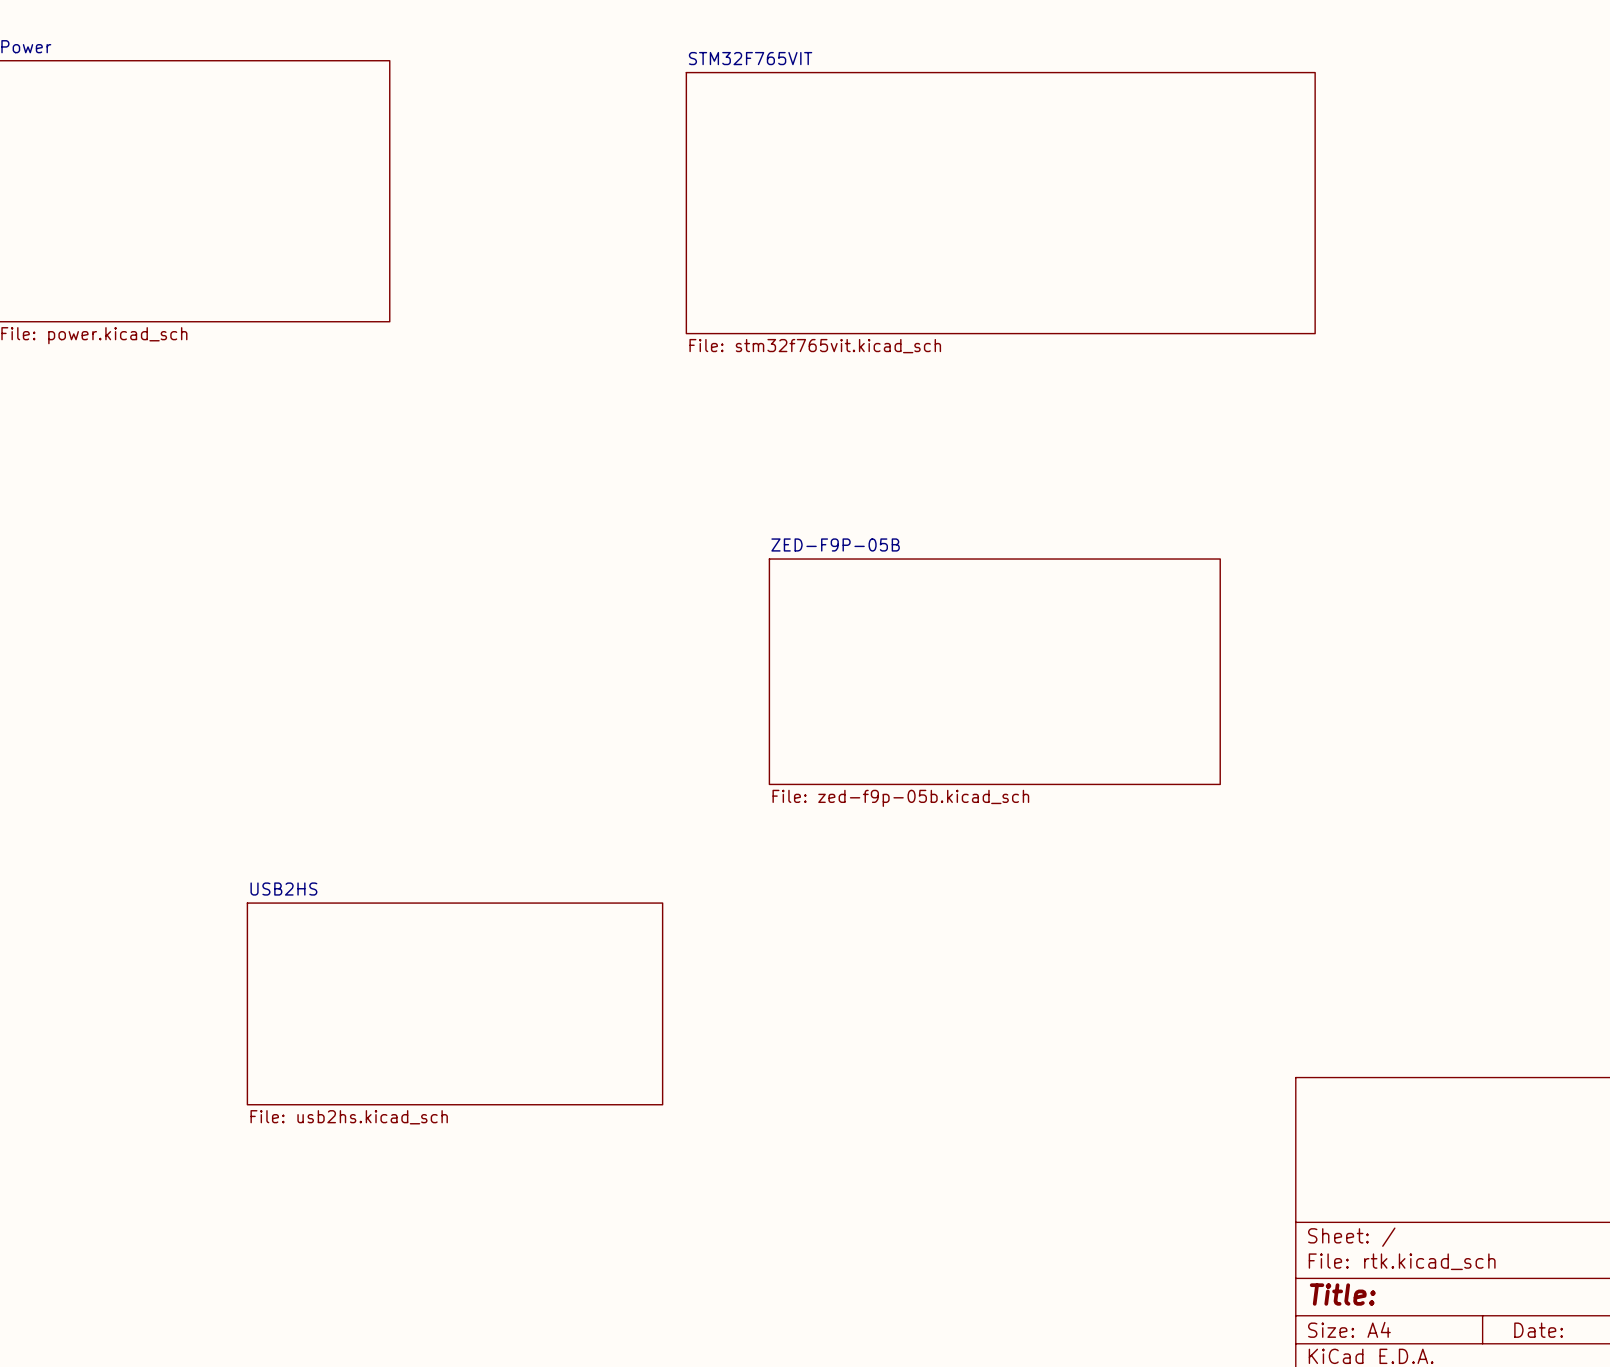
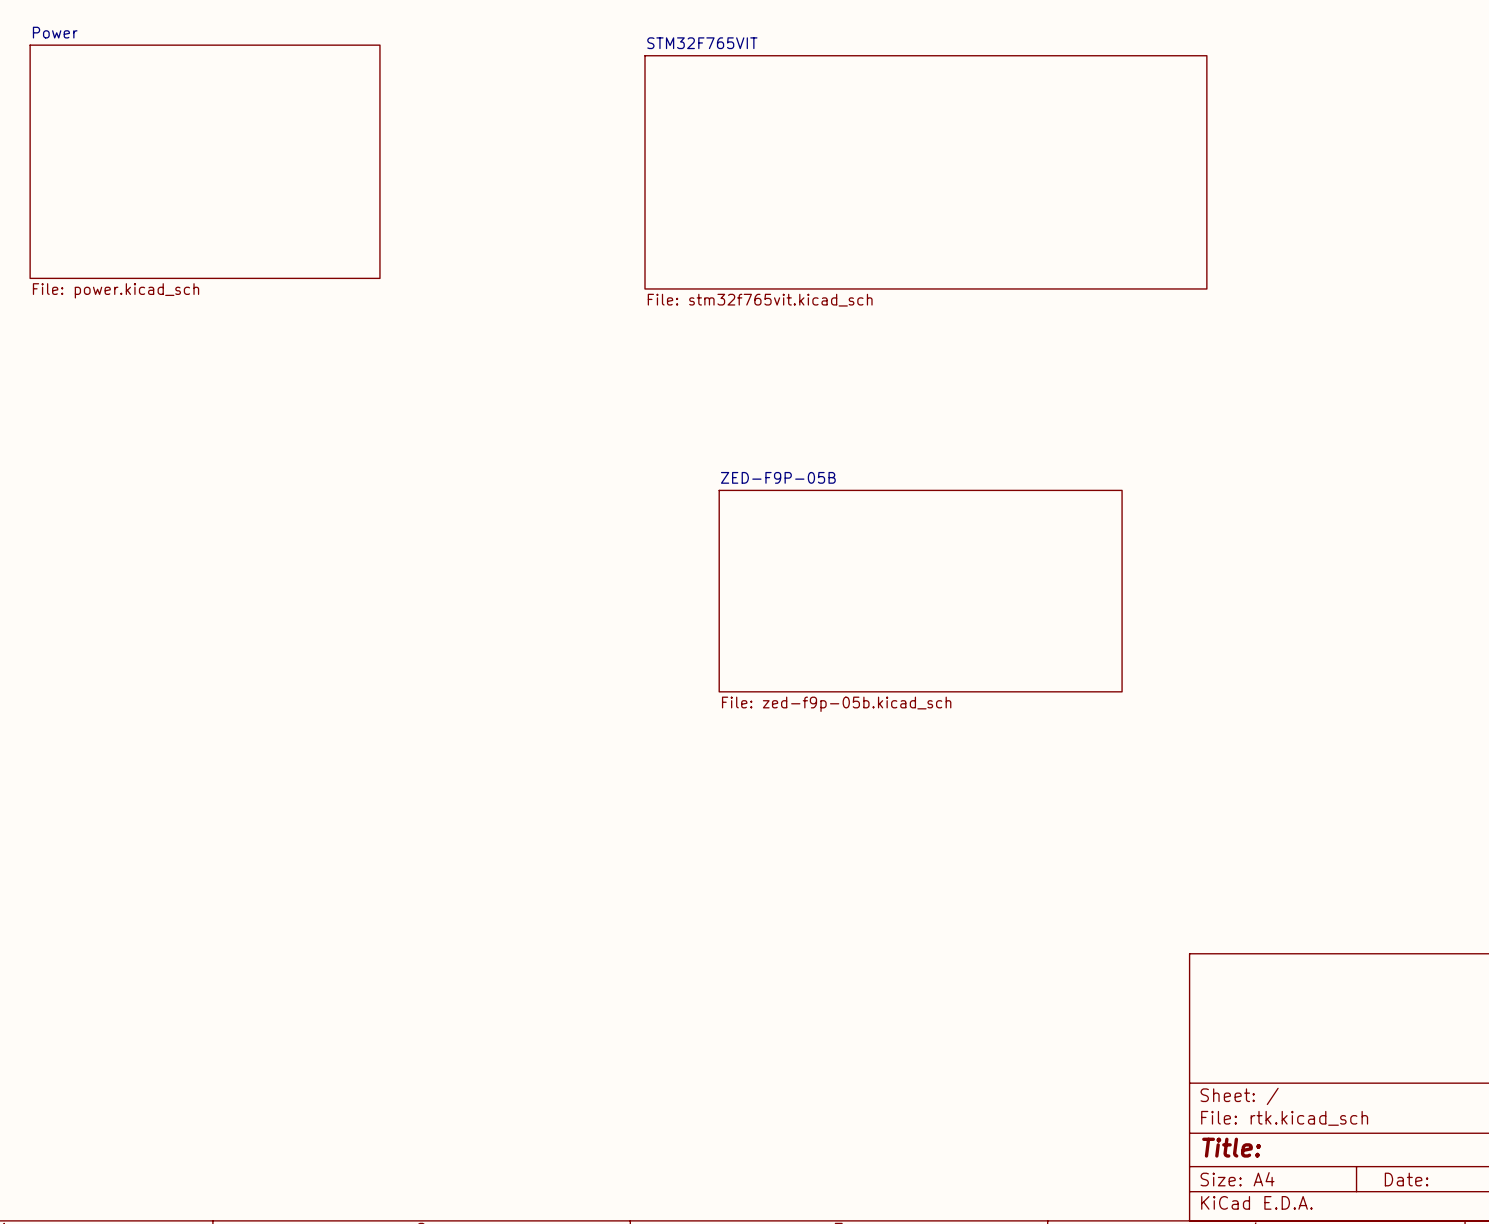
sheet USB2HS: File: usb2hs.kicad_sch (455, 1003) -> none

